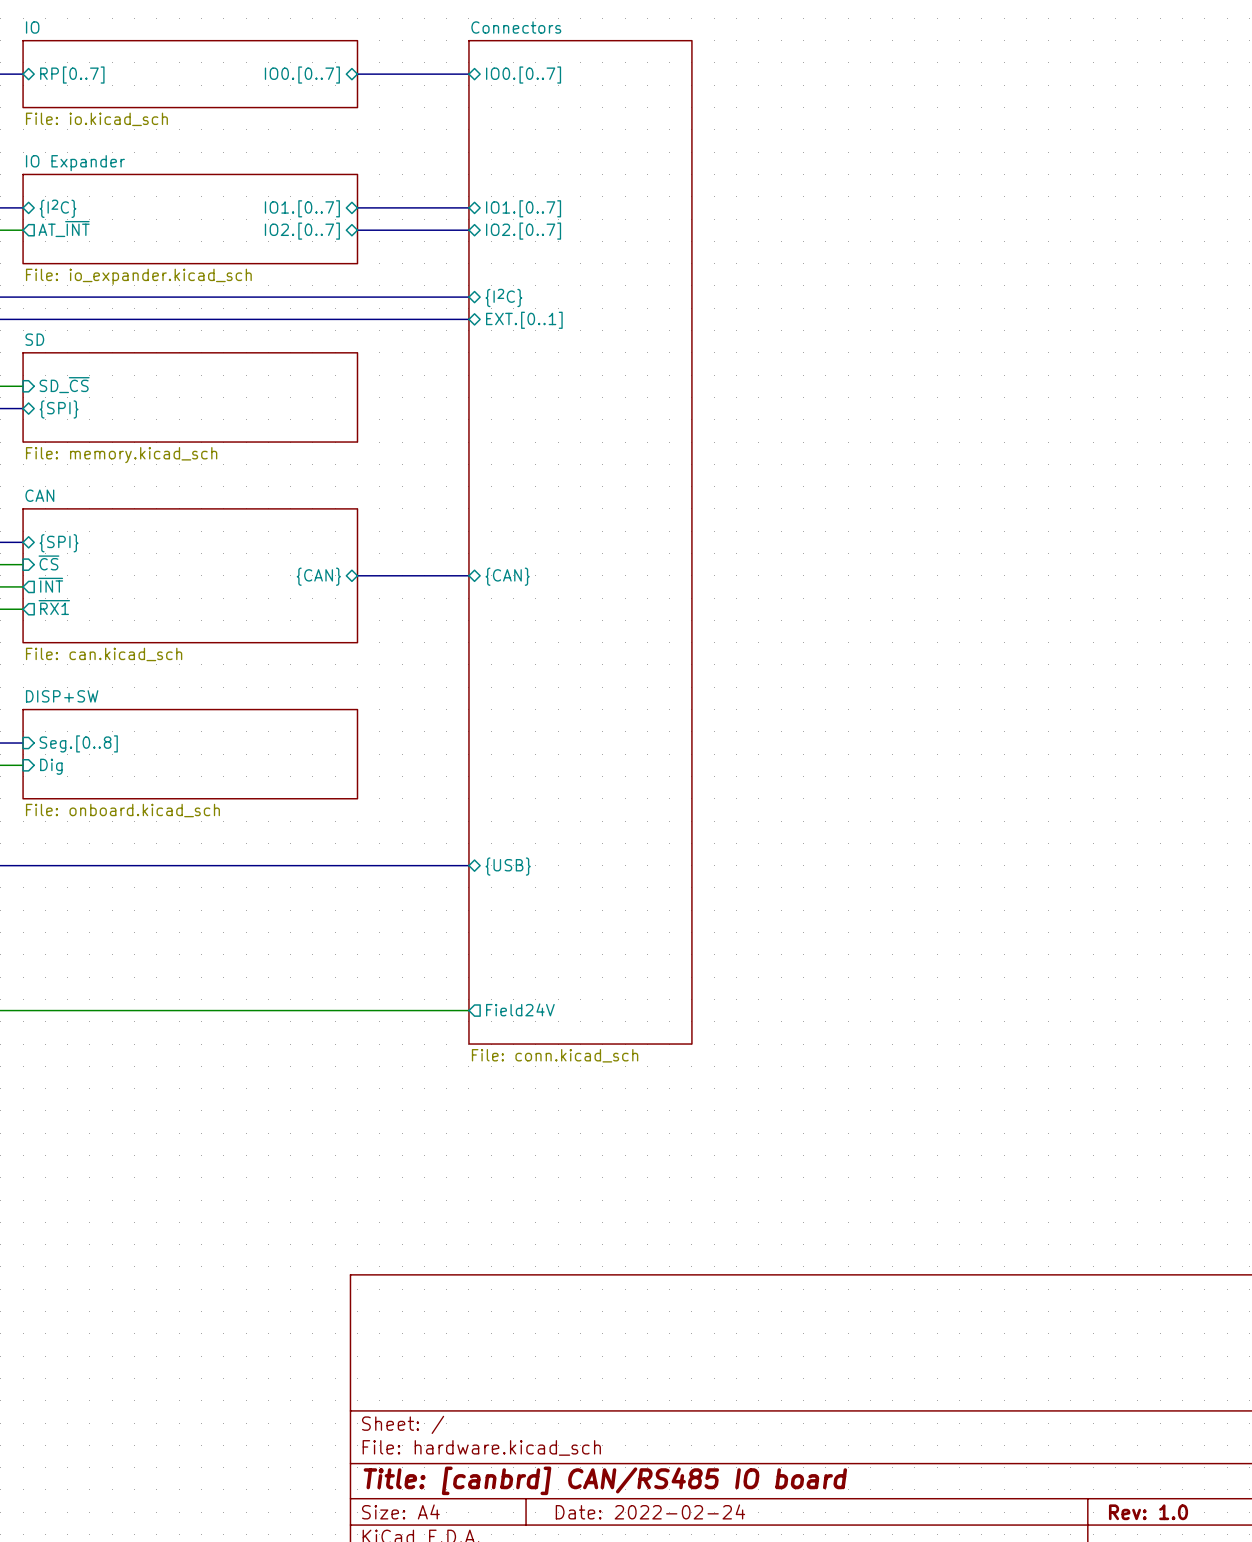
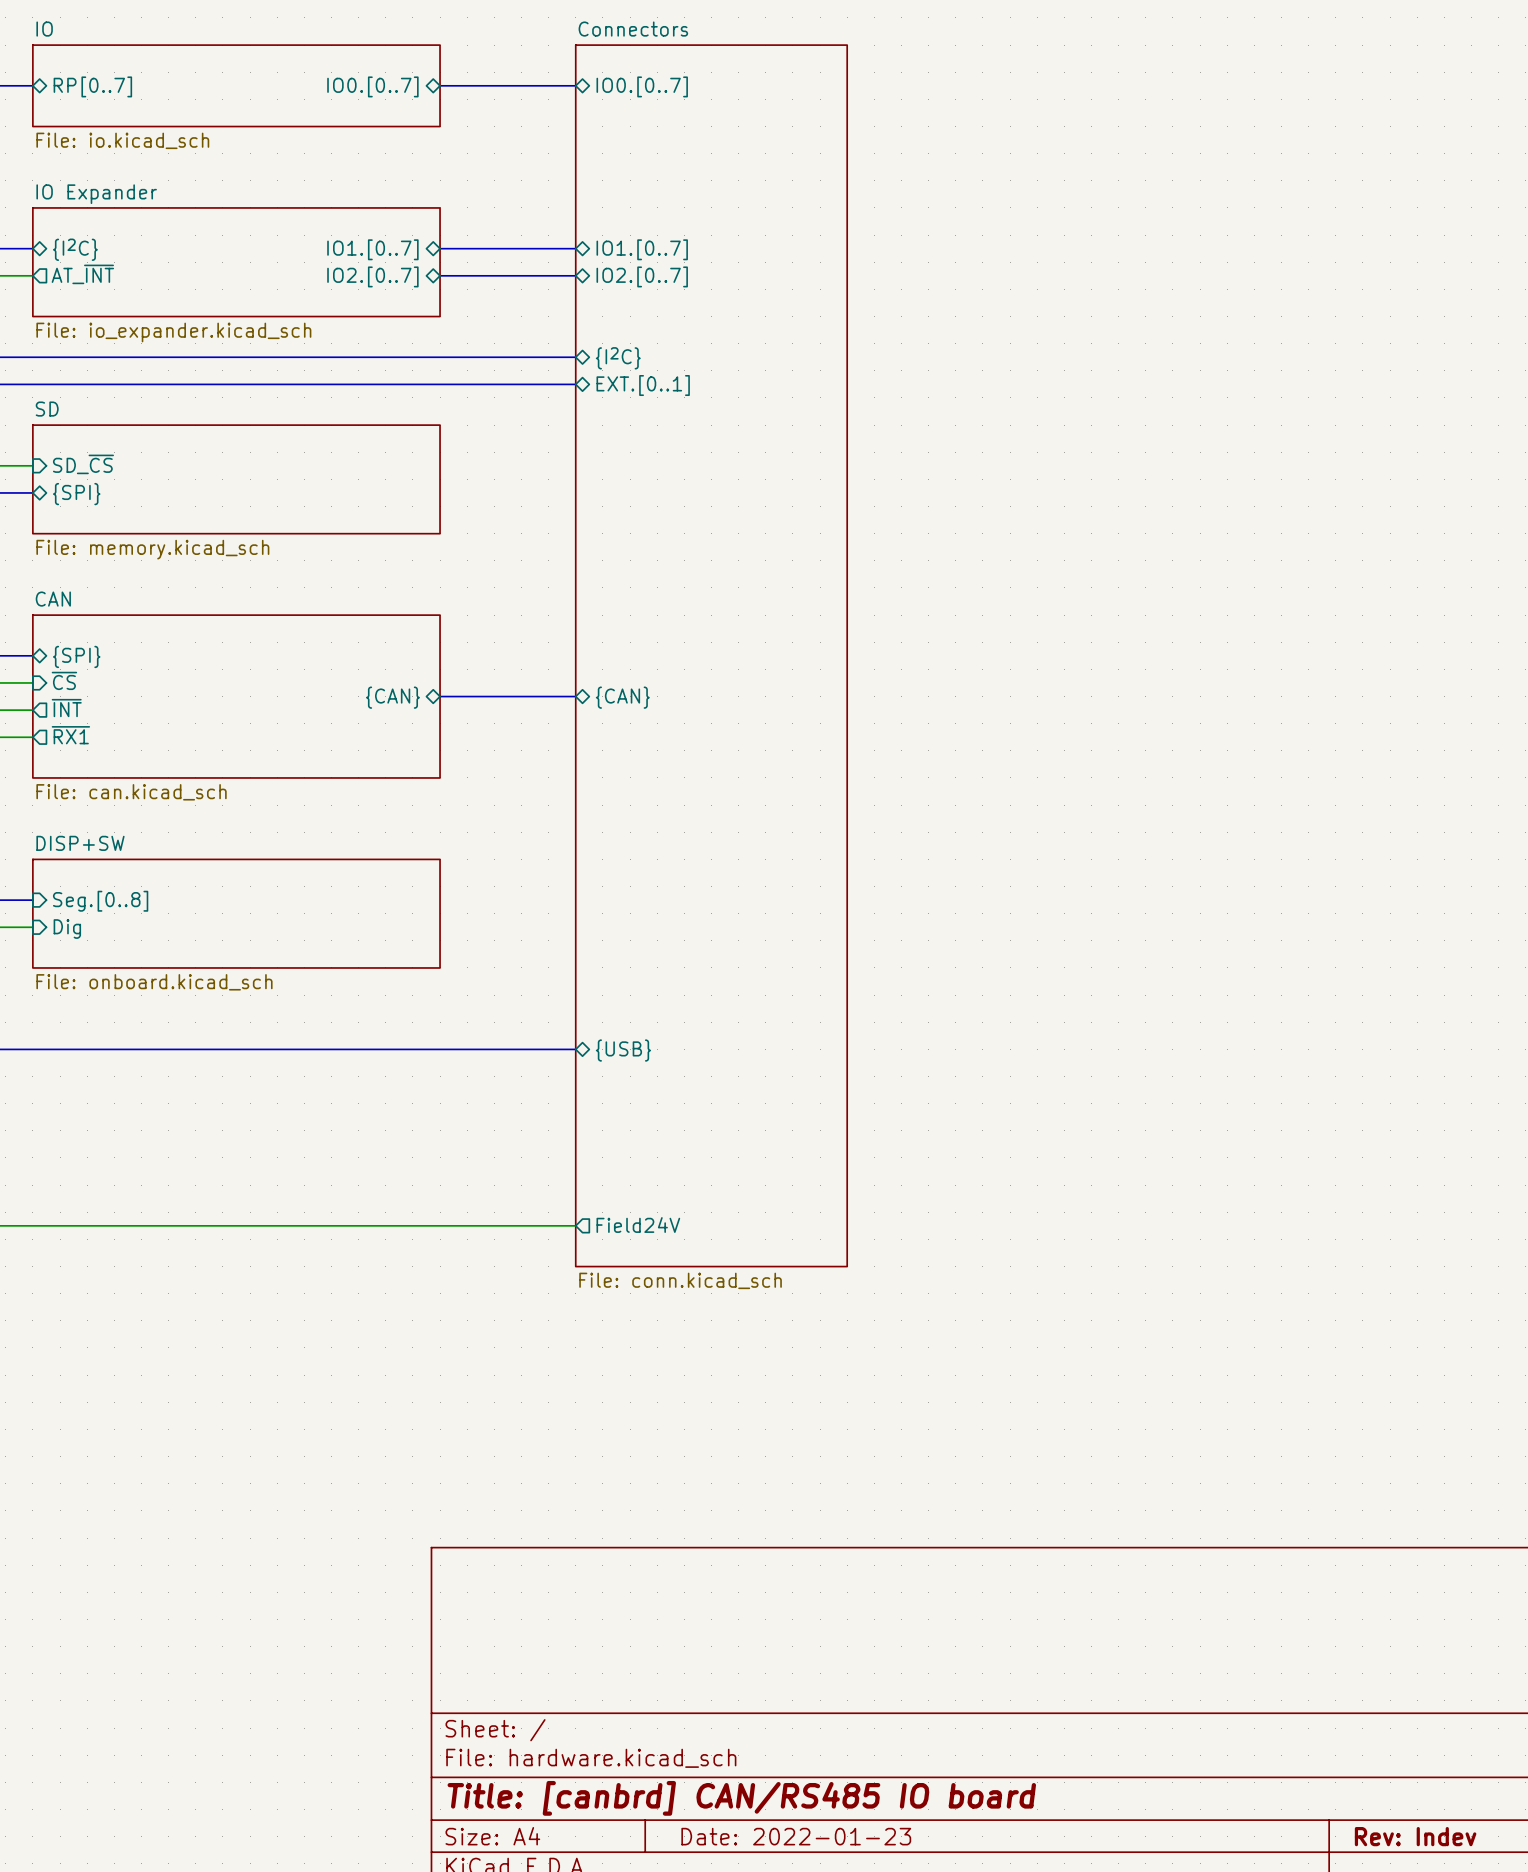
title block: Date: 2022-02-24 (650, 1511) -> Date: 2022-01-23 (796, 1836)
title block: Rev: 1.0 (1148, 1512) -> Rev: Indev (1415, 1836)

